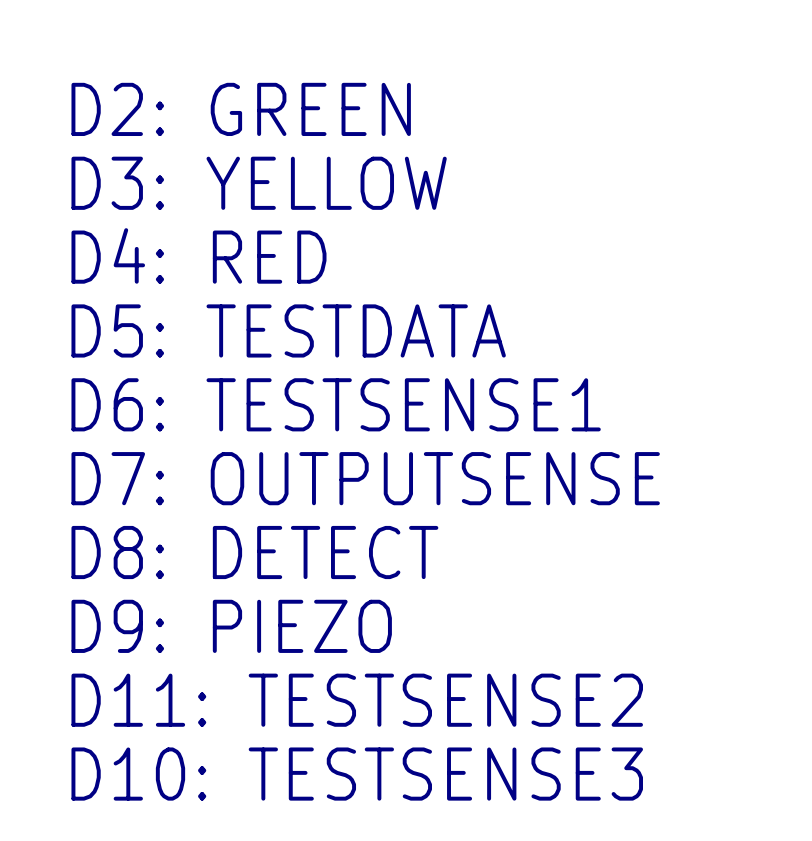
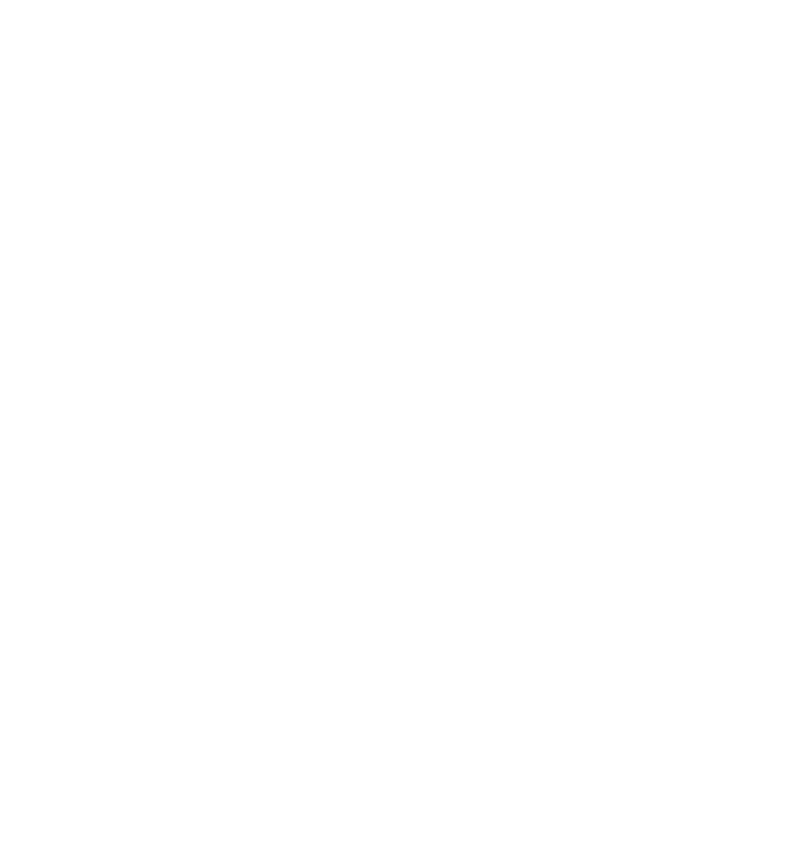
text: D2: GREEN (241, 109) -> none
text: D3: YELLOW (259, 183) -> none
text: D4: RED (198, 255) -> none
text: D5: TESTDATA (288, 330) -> none
text: D6: TESTSENSE1 (336, 404) -> none
text: D7: OUTPUTSENSE (365, 478) -> none
text: D8: DETECT (254, 552) -> none
text: D9: PIEZO (231, 626) -> none
text: D11: TESTSENSE2 (357, 700) -> none
text: D10: TESTSENSE3 (357, 774) -> none

